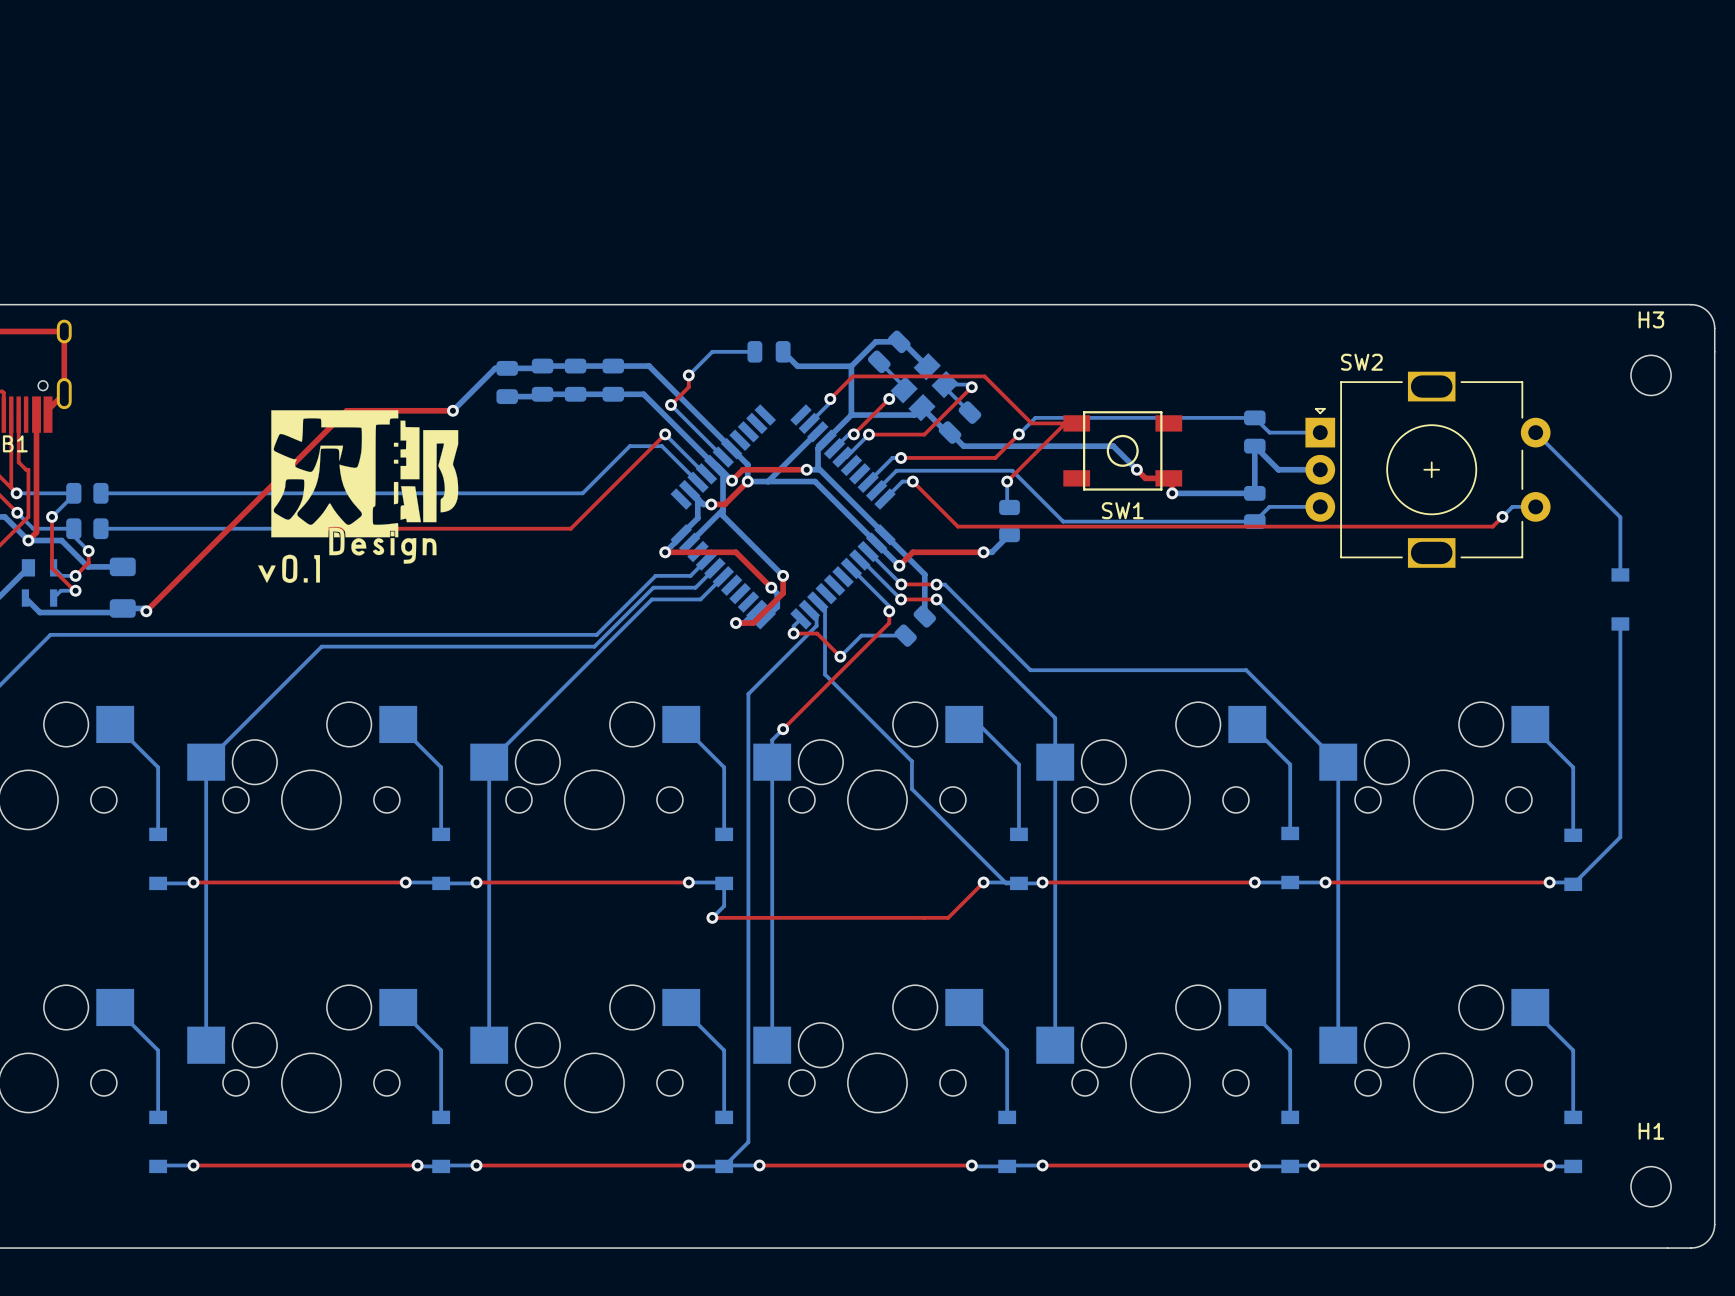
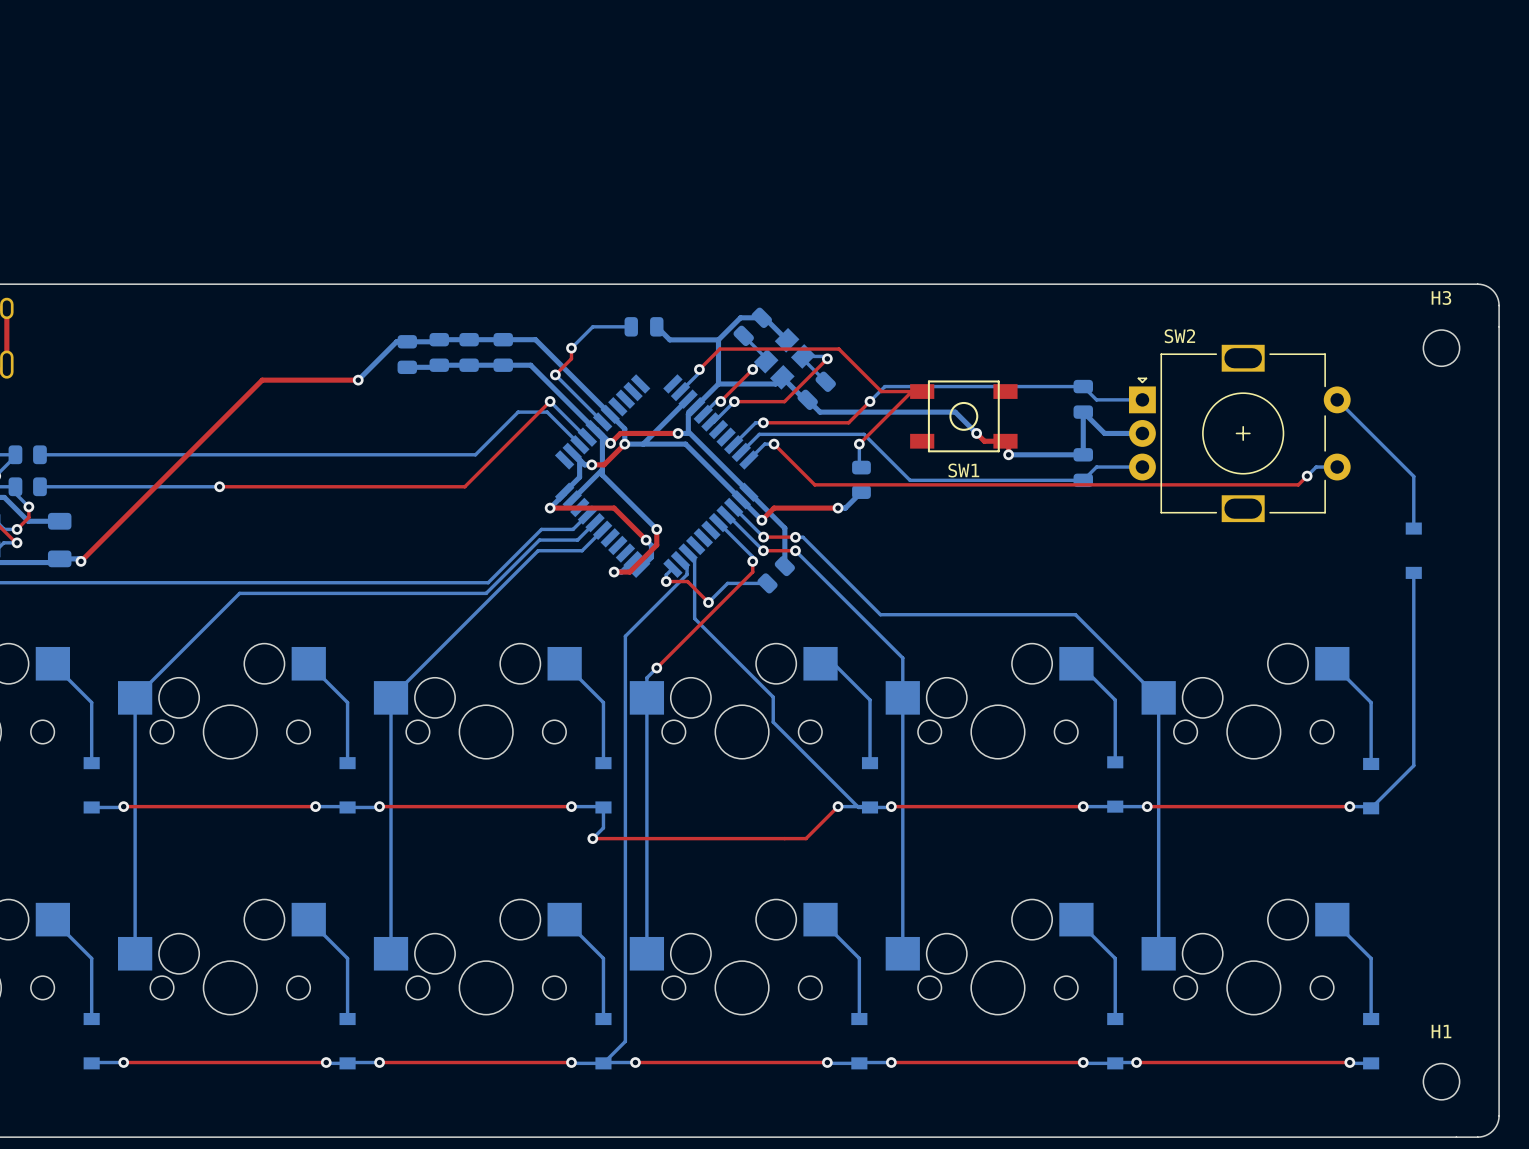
drawing: [258, 410, 459, 584] -> none

